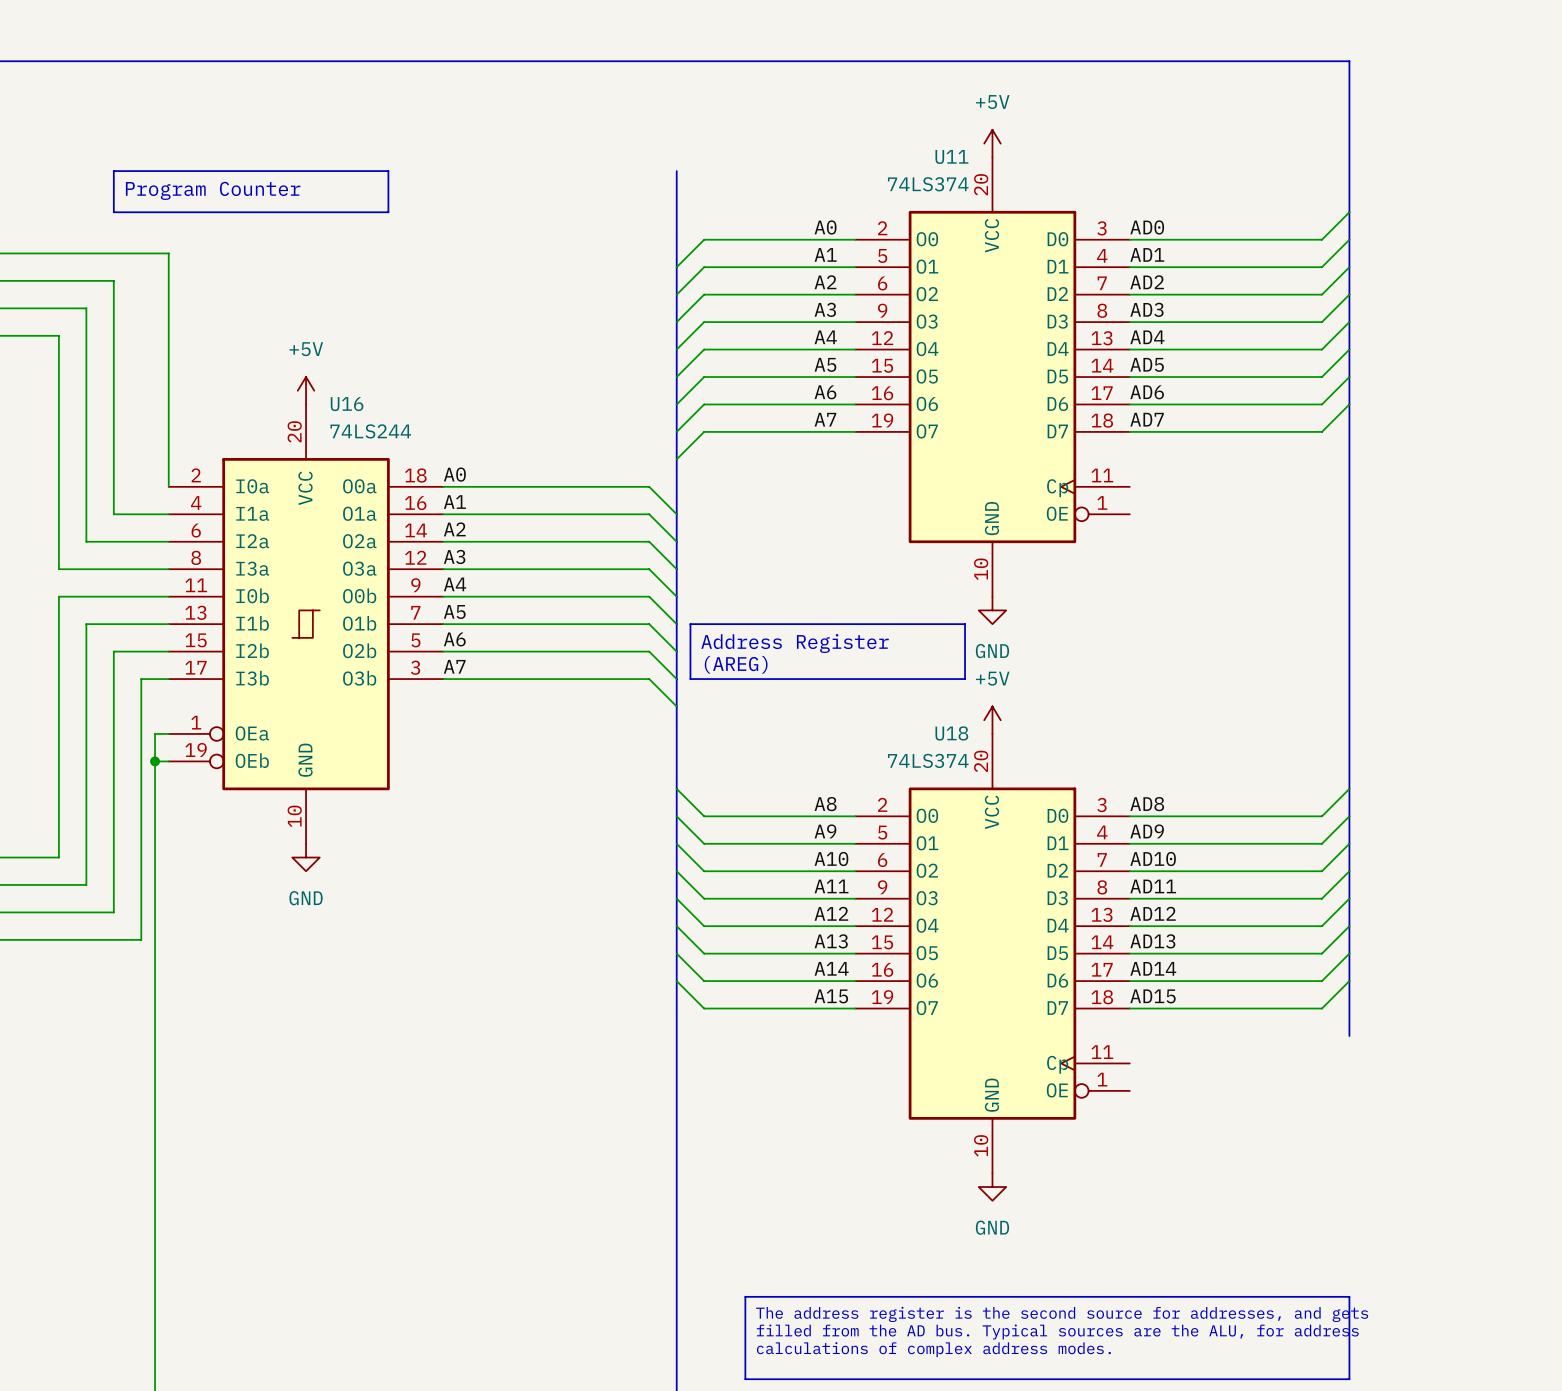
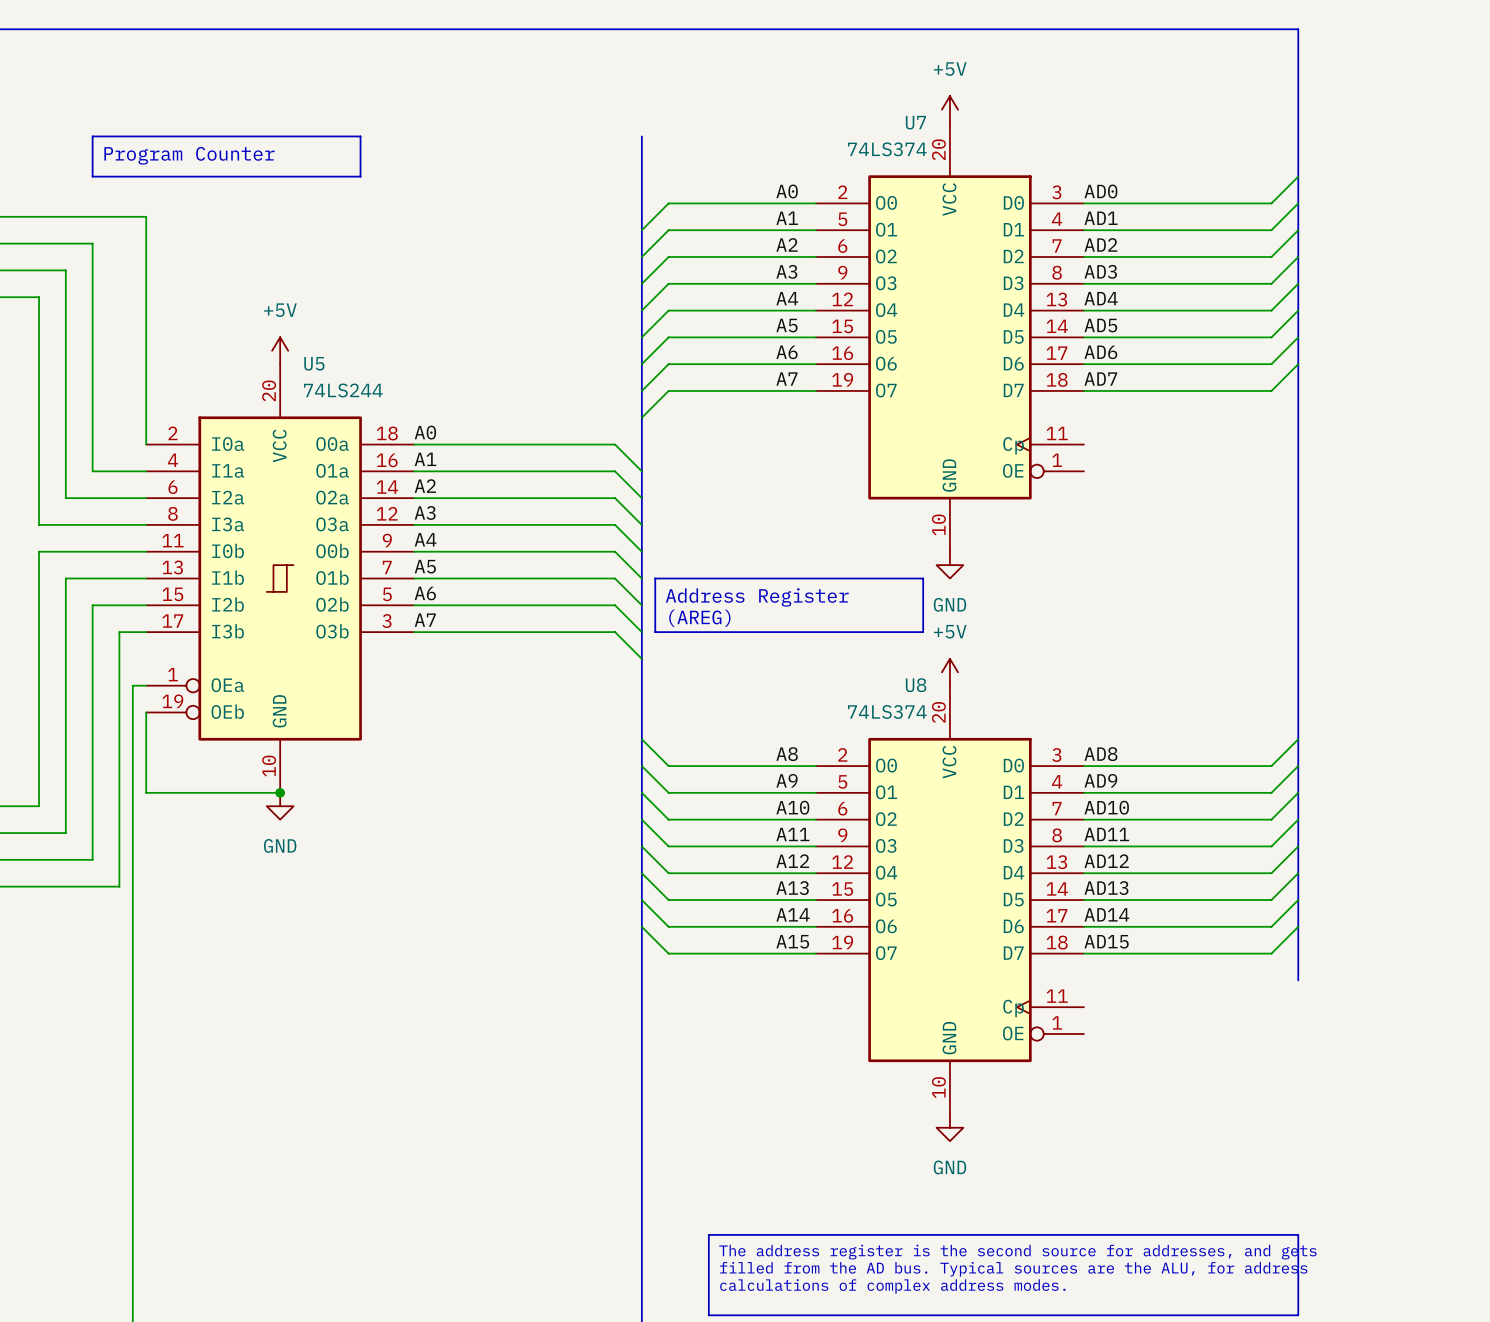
U11 name: U11 (951, 156) -> U7 (915, 122)
U16 name: U16 (347, 404) -> U5 (314, 363)
U18 name: U18 (951, 733) -> U8 (916, 685)
wire: (155, 761) (168, 761) -> (280, 792) (146, 792) (146, 712)
junction: (155, 761) -> none
junction: none -> (280, 792)

